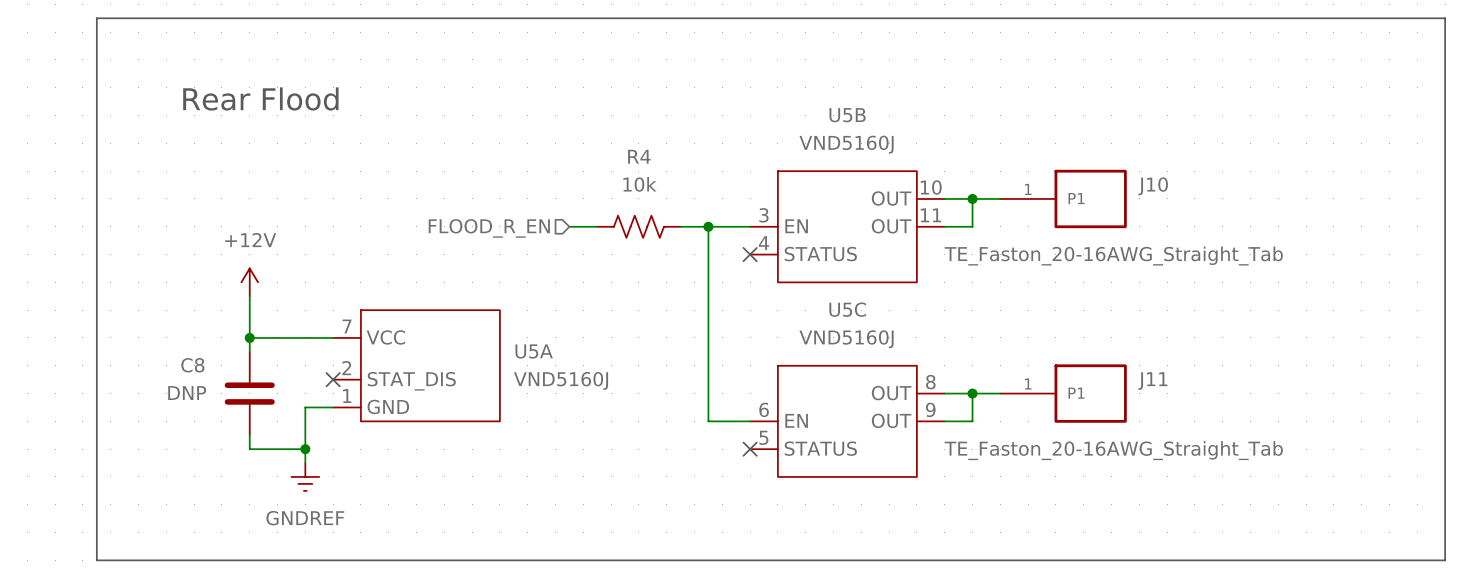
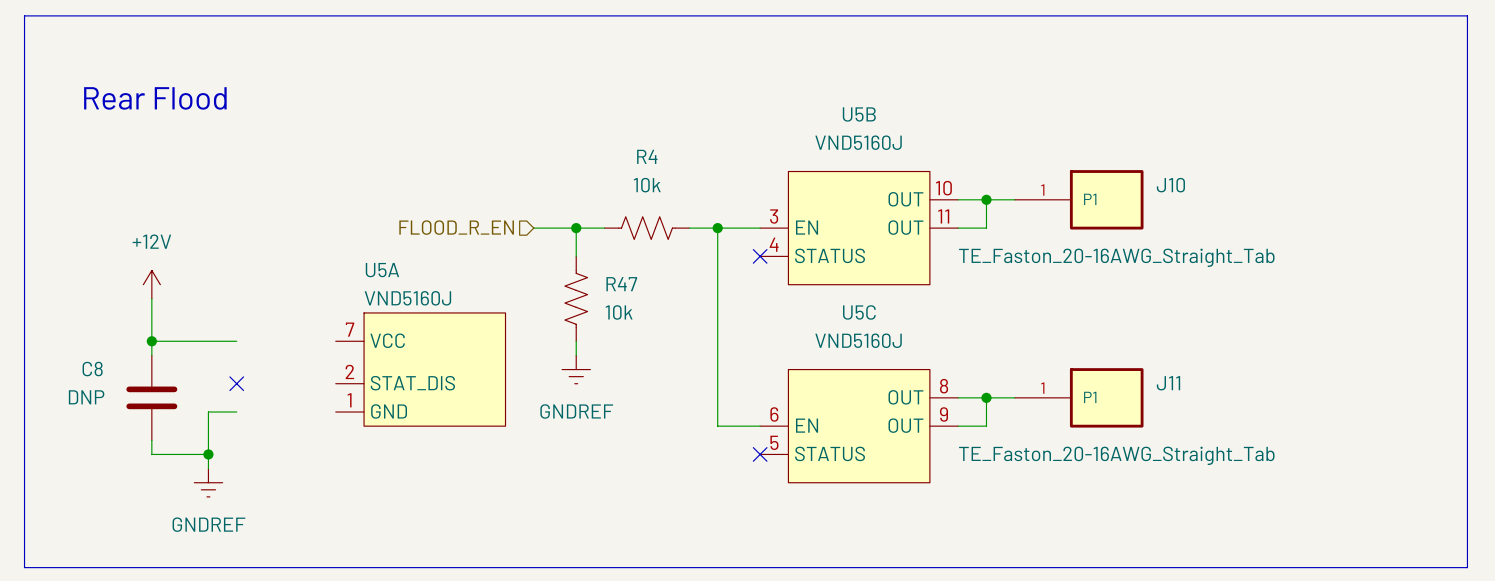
line: (96, 18) (96, 560) -> (95, 15) (24, 15) (24, 567) (95, 567)
text position: Rear Flood (260, 98) -> Rear Flood (155, 98)
wire: none -> (533, 228) (576, 228) (576, 256)
junction: none -> (576, 228)
hierarchical label position: FLOOD_R_EN (489, 228) -> FLOOD_R_EN (456, 227)
power symbol position: +12V (249, 282) -> +12V (151, 284)
wire: (249, 296) (249, 351) -> (151, 298) (151, 355)
R47: none -> 10k (576, 298)
junction: none -> (151, 341)
wire: (249, 337) (333, 337) -> (151, 341) (236, 341)
junction: (249, 337) -> none
wire: none -> (576, 341) (576, 355)
U5A name position: U5A (534, 351) -> U5A (382, 270)
power symbol: none -> GNDREF (576, 369)
no-connect mark: none -> (236, 383)
no-connect mark: (333, 379) -> none
U5A value position: VND5160J (561, 380) -> VND5160J (407, 298)
C8 position: (249, 393) -> (151, 397)
wire: (333, 407) (305, 407) (305, 463) -> (236, 412) (208, 412) (208, 468)
wire: (249, 435) (249, 449) (305, 449) -> (151, 440) (151, 454) (208, 454)
junction: none -> (208, 454)
junction: (305, 449) -> none
power symbol position: GNDREF (305, 476) -> GNDREF (208, 482)

